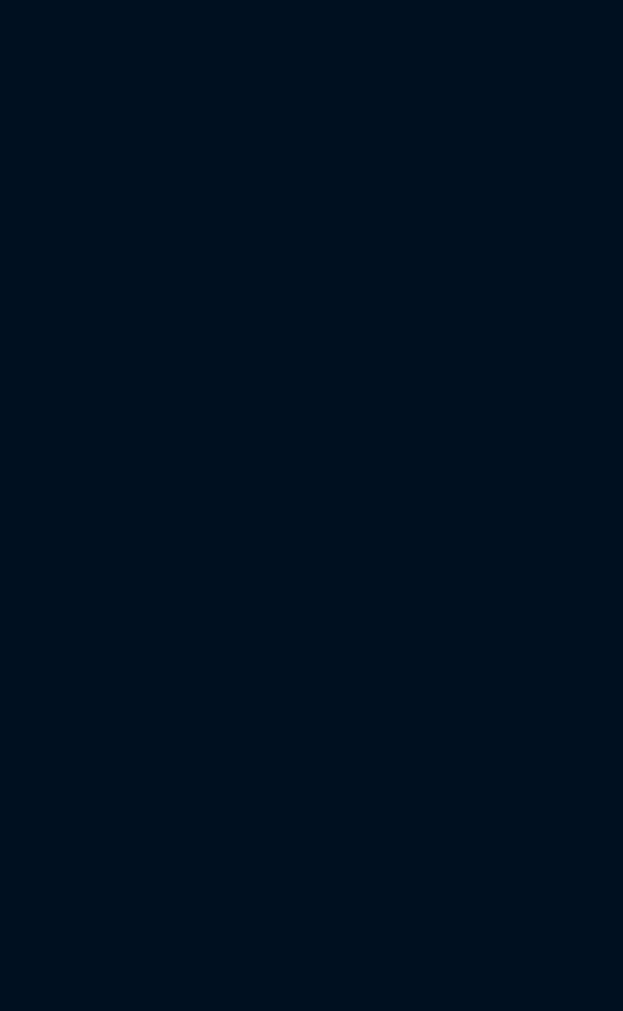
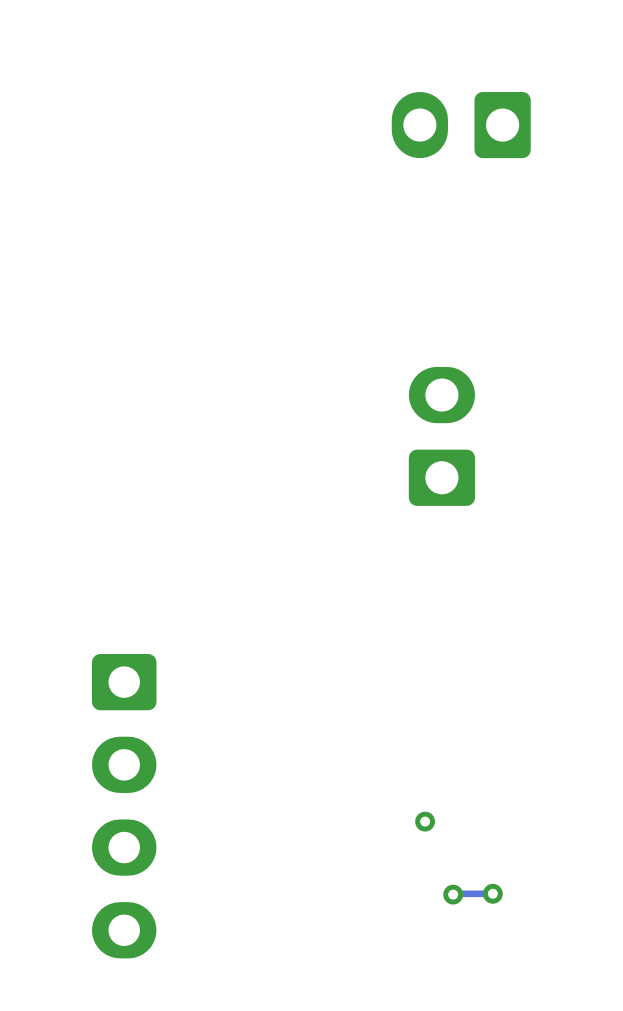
part: none -> (461, 125)
part: none -> (441, 436)
part: none -> (124, 806)
via: none -> (425, 821)
track: none -> (492, 893) (453, 894)
via: none -> (492, 893)
via: none -> (453, 894)

